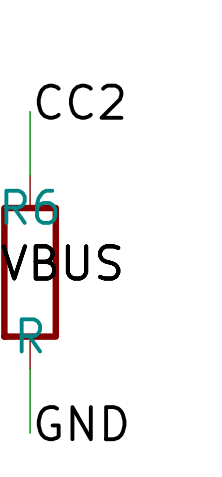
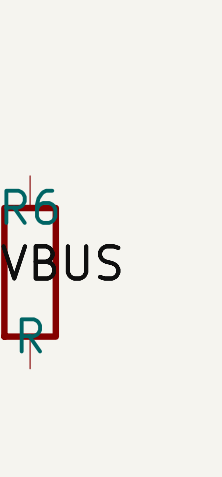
label: CC2 (80, 101) -> none
wire: (30, 111) (30, 175) -> none
wire: (30, 368) (30, 433) -> none
label: GND (81, 423) -> none

